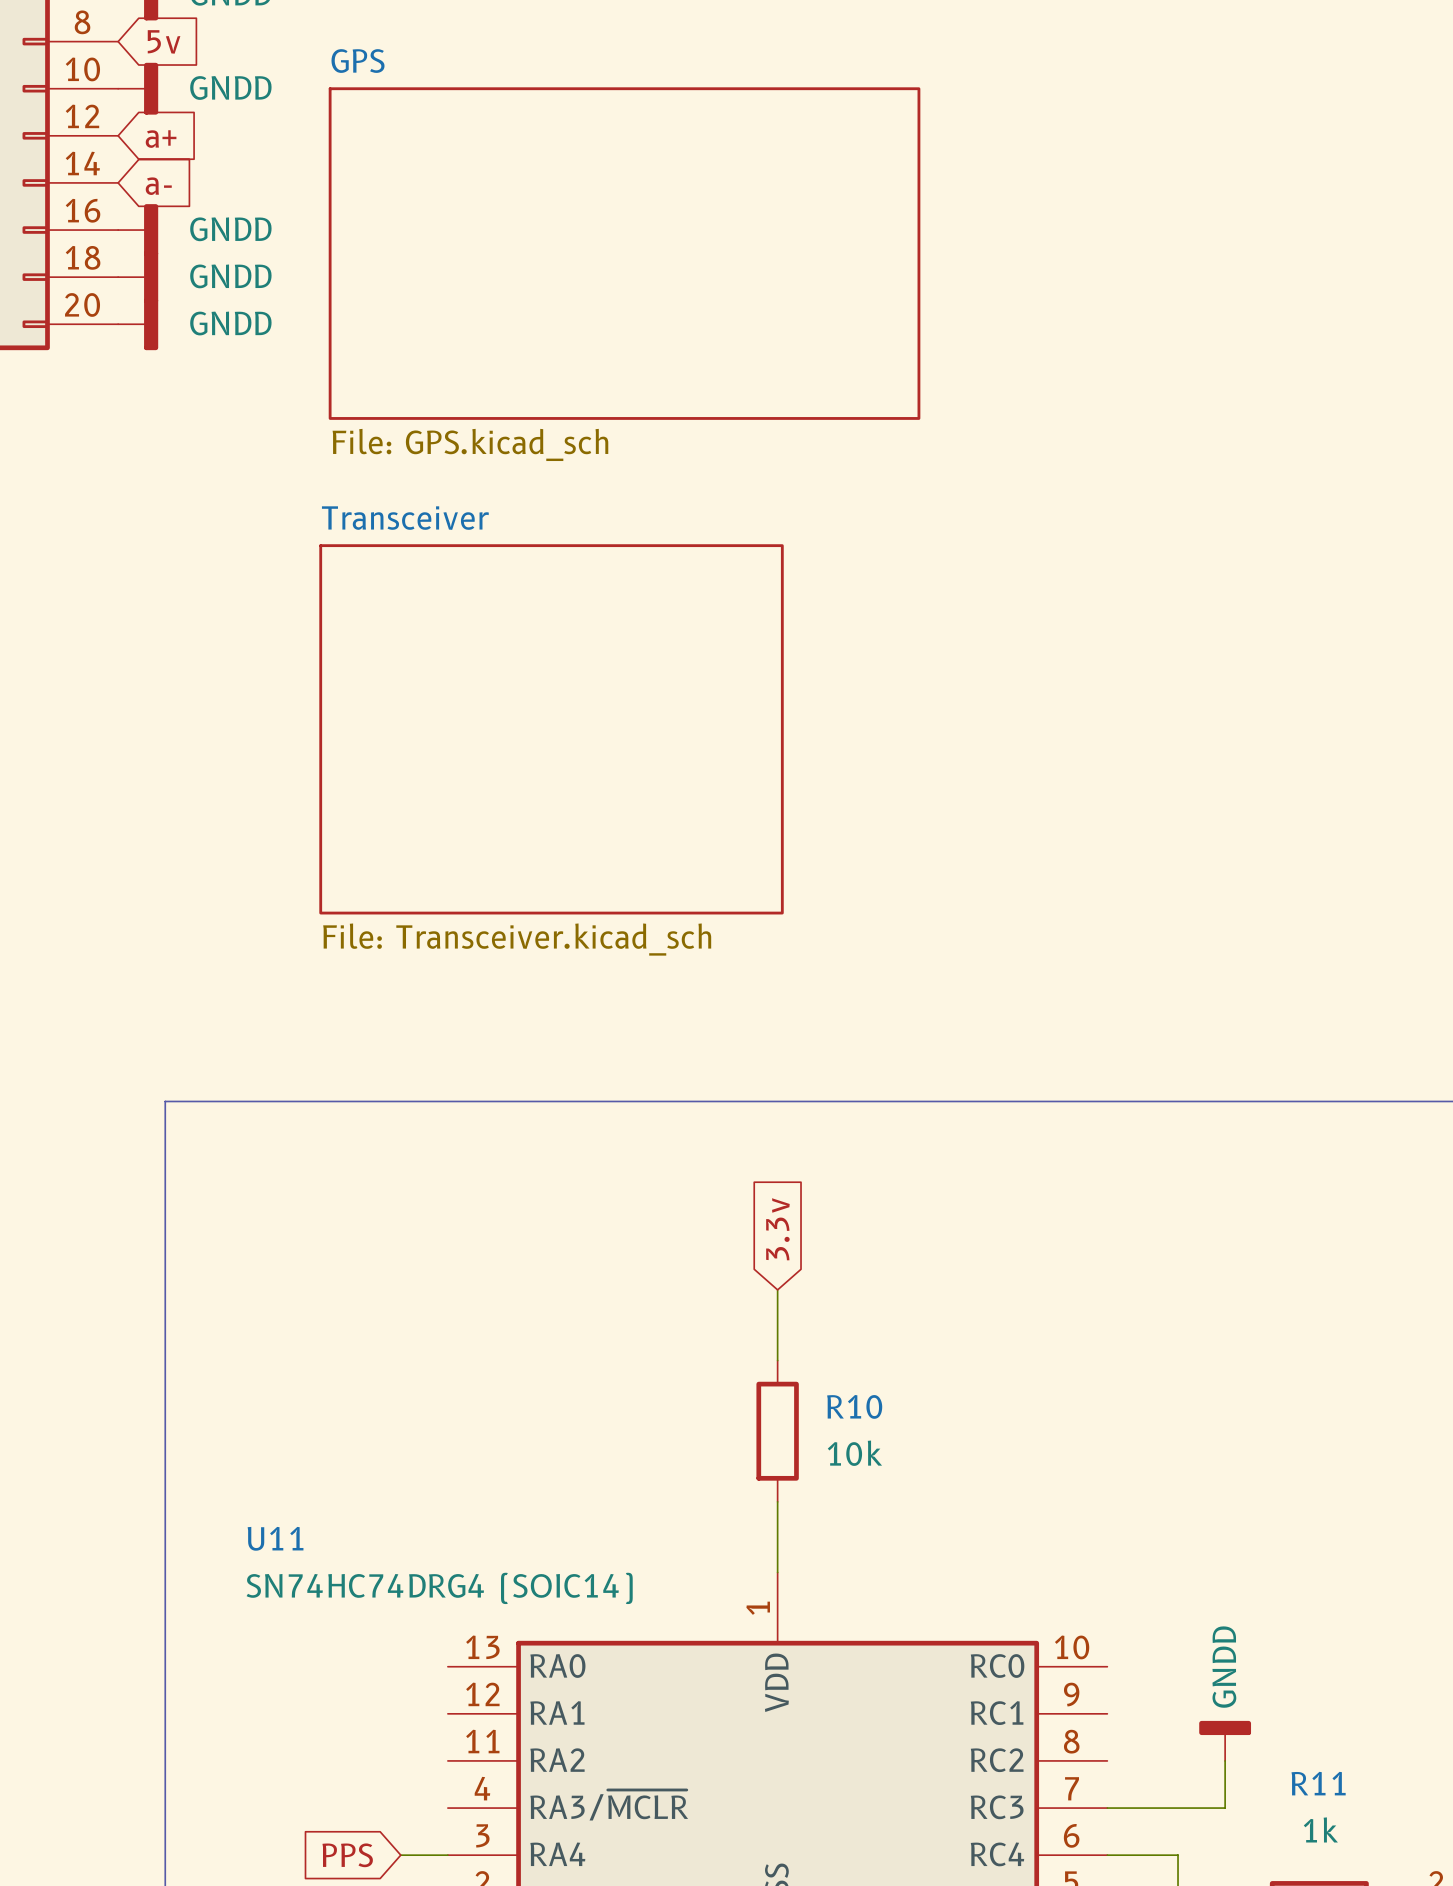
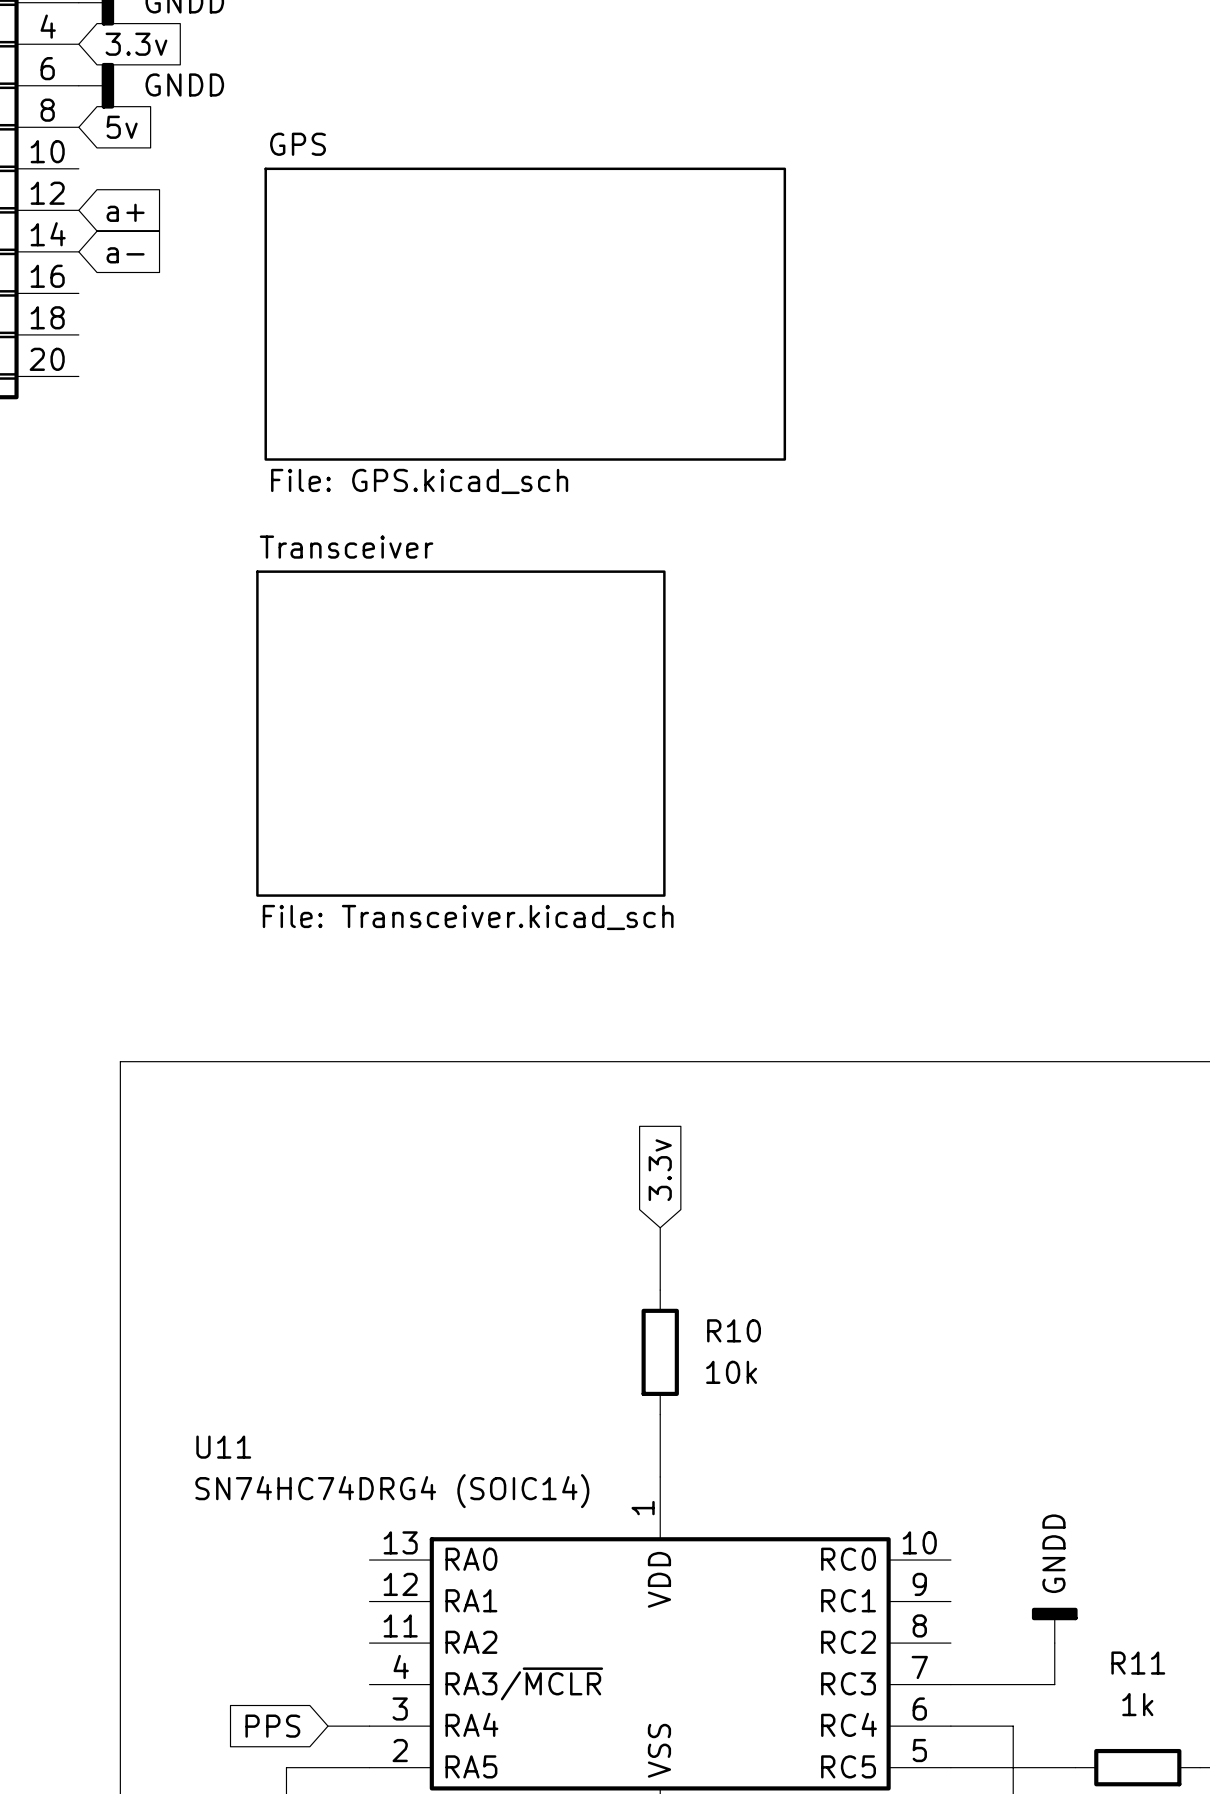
power symbol: GNDD (138, 88) -> none
power symbol: GNDD (138, 230) -> none
power symbol: GNDD (138, 277) -> none
power symbol: GNDD (138, 324) -> none

